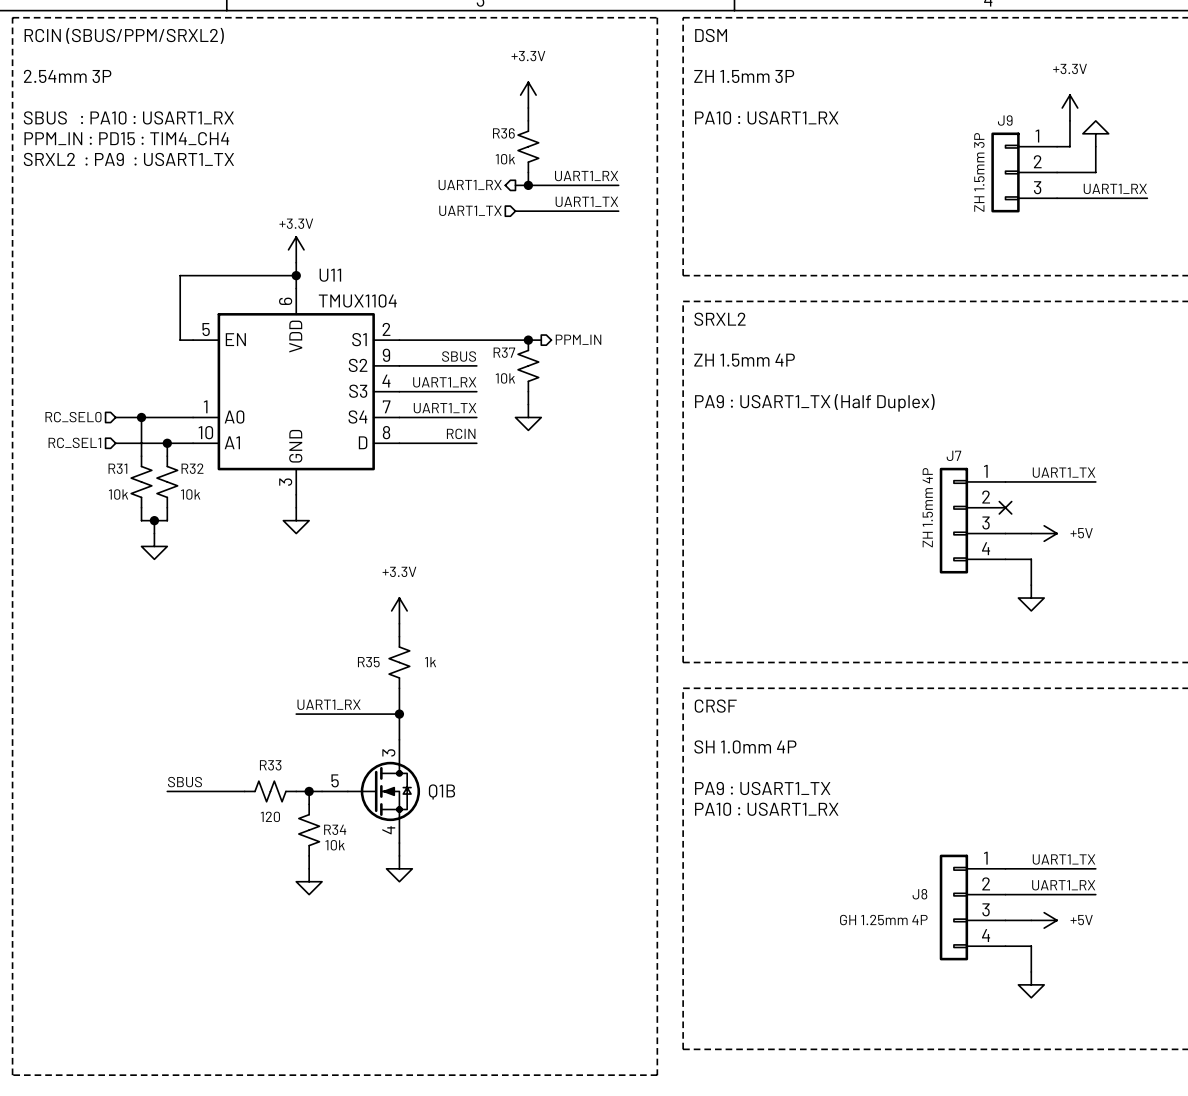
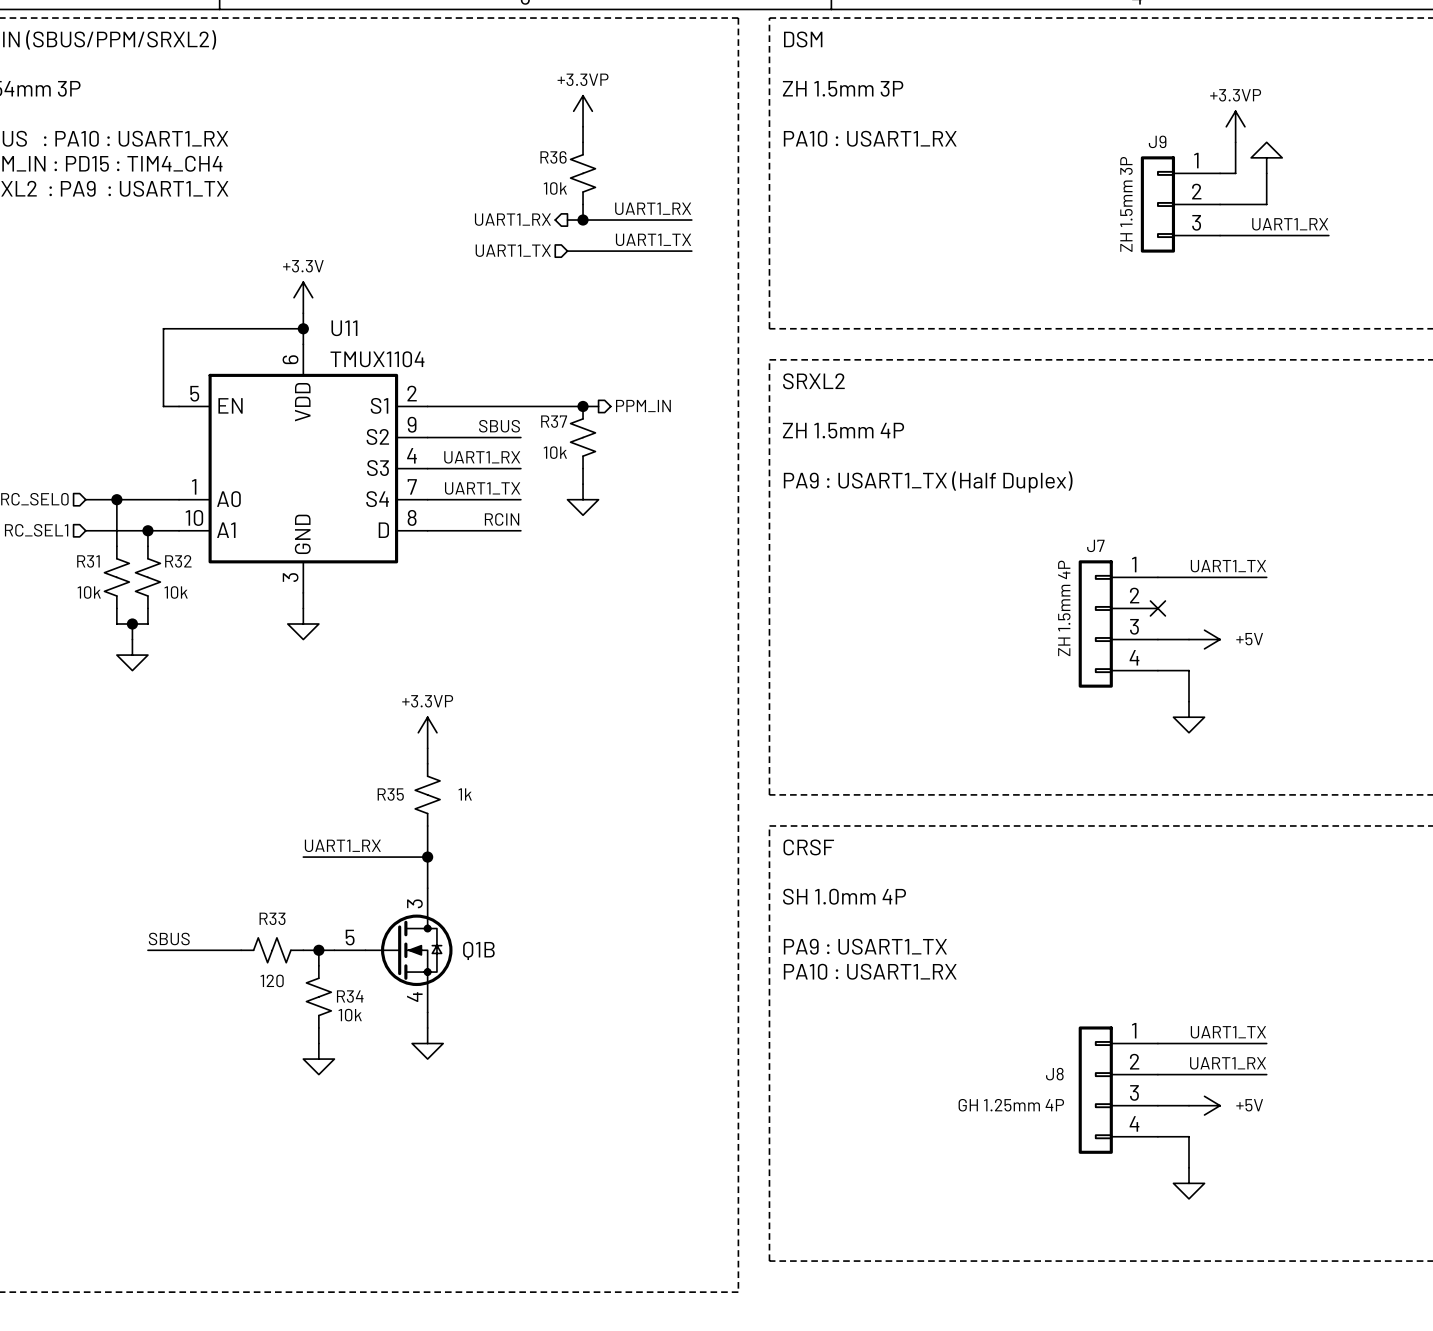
power symbol: +3.3V (528, 95) -> +3.3VP (583, 111)
power symbol: +3.3V (1069, 108) -> +3.3VP (1235, 126)
power symbol: +3.3V (399, 610) -> +3.3VP (427, 732)

